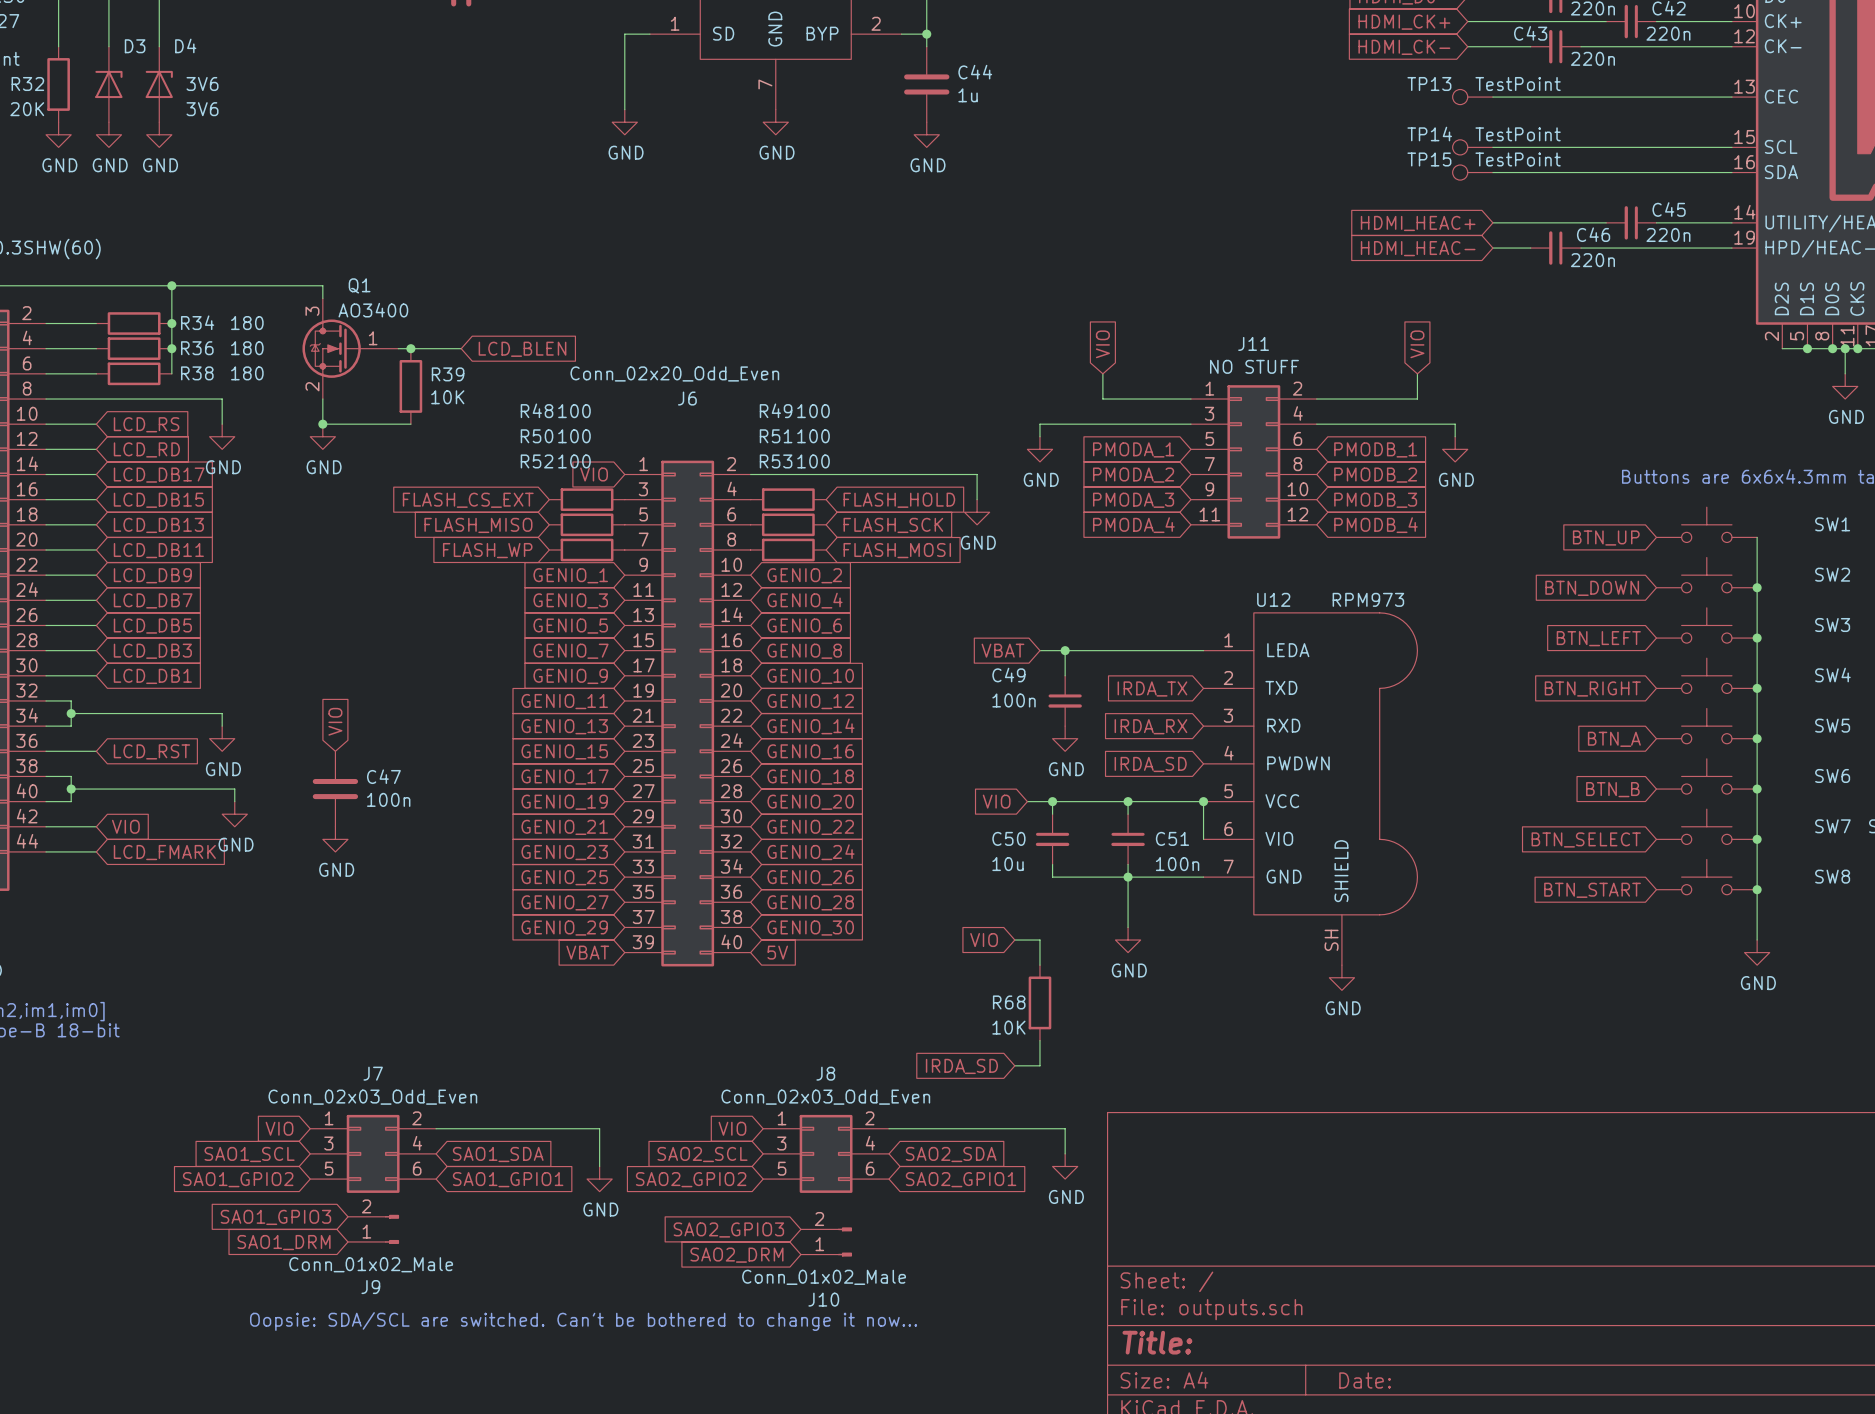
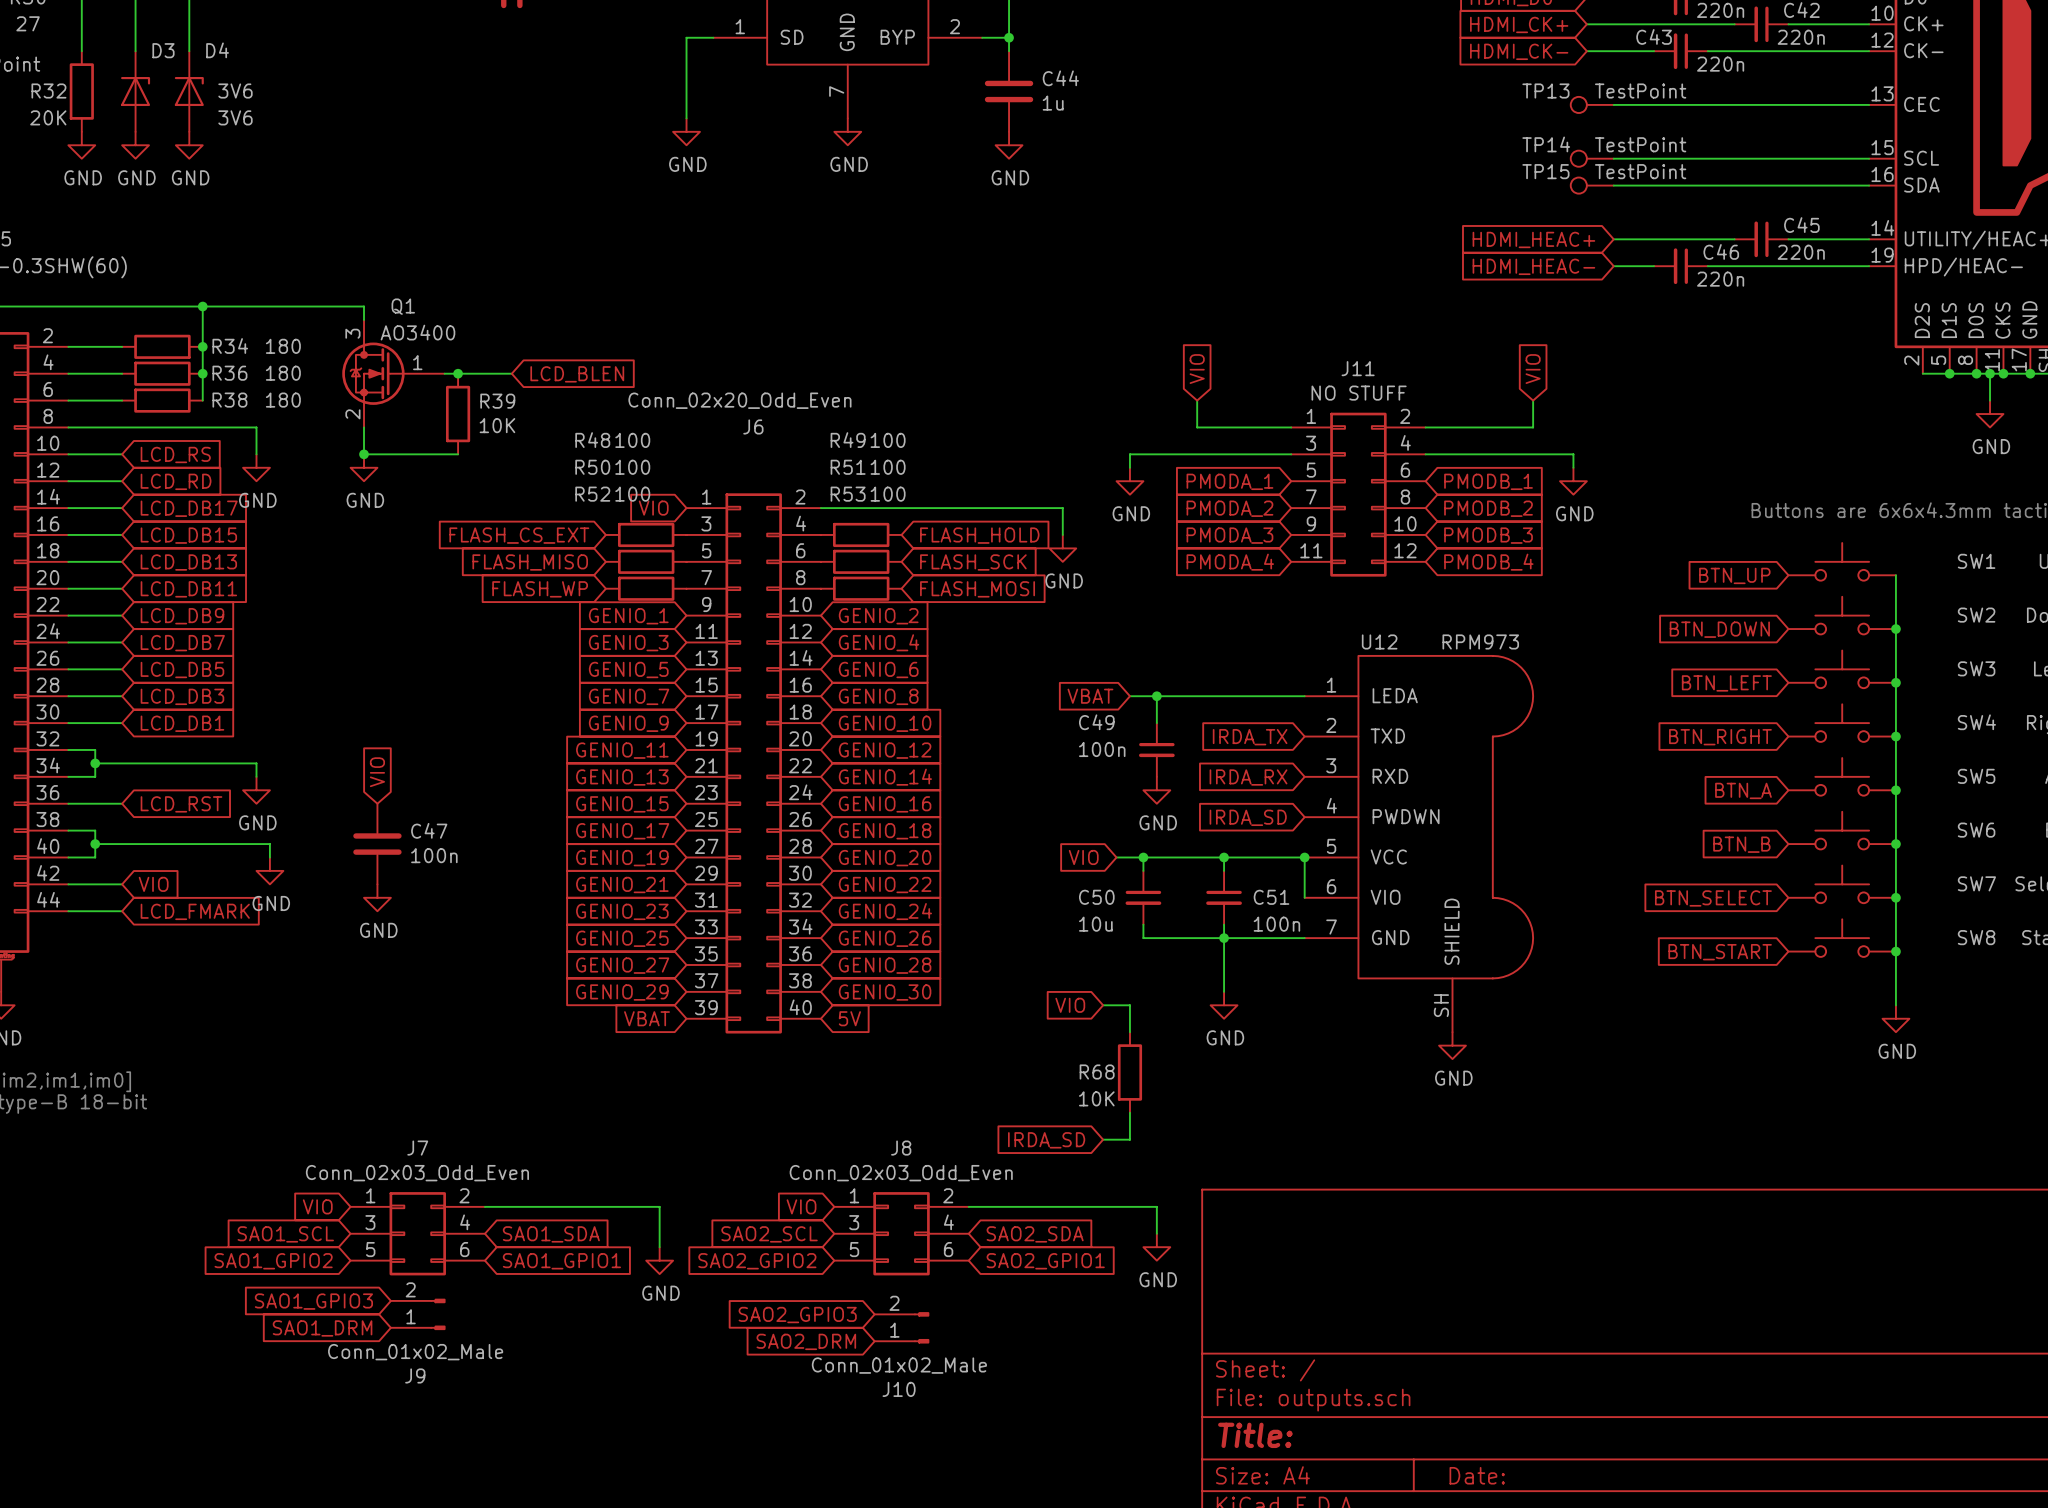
text: Oopsie: SDA/SCL are switched. Can't be bothered to change it now... (583, 1321) -> none

